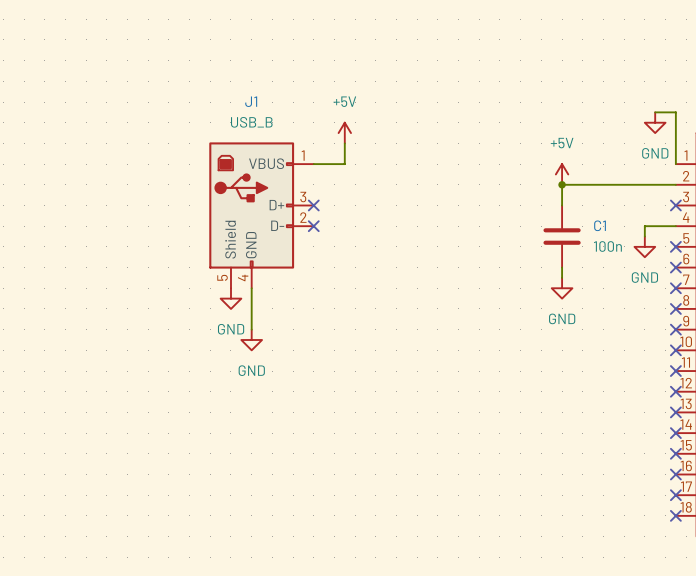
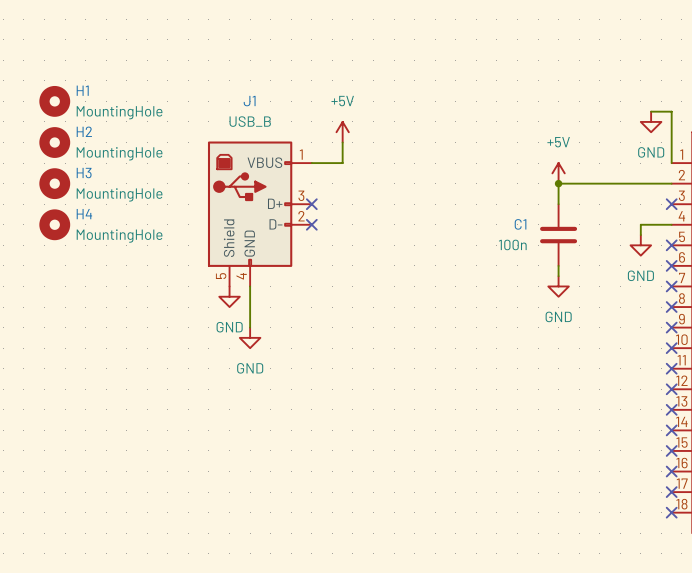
H1: none -> MountingHole (54, 101)
H2: none -> MountingHole (54, 142)
H3: none -> MountingHole (54, 183)
C1 name position: C1 (600, 225) -> C1 (520, 224)
H4: none -> MountingHole (54, 224)
C1 value position: 100n (607, 246) -> 100n (512, 244)

